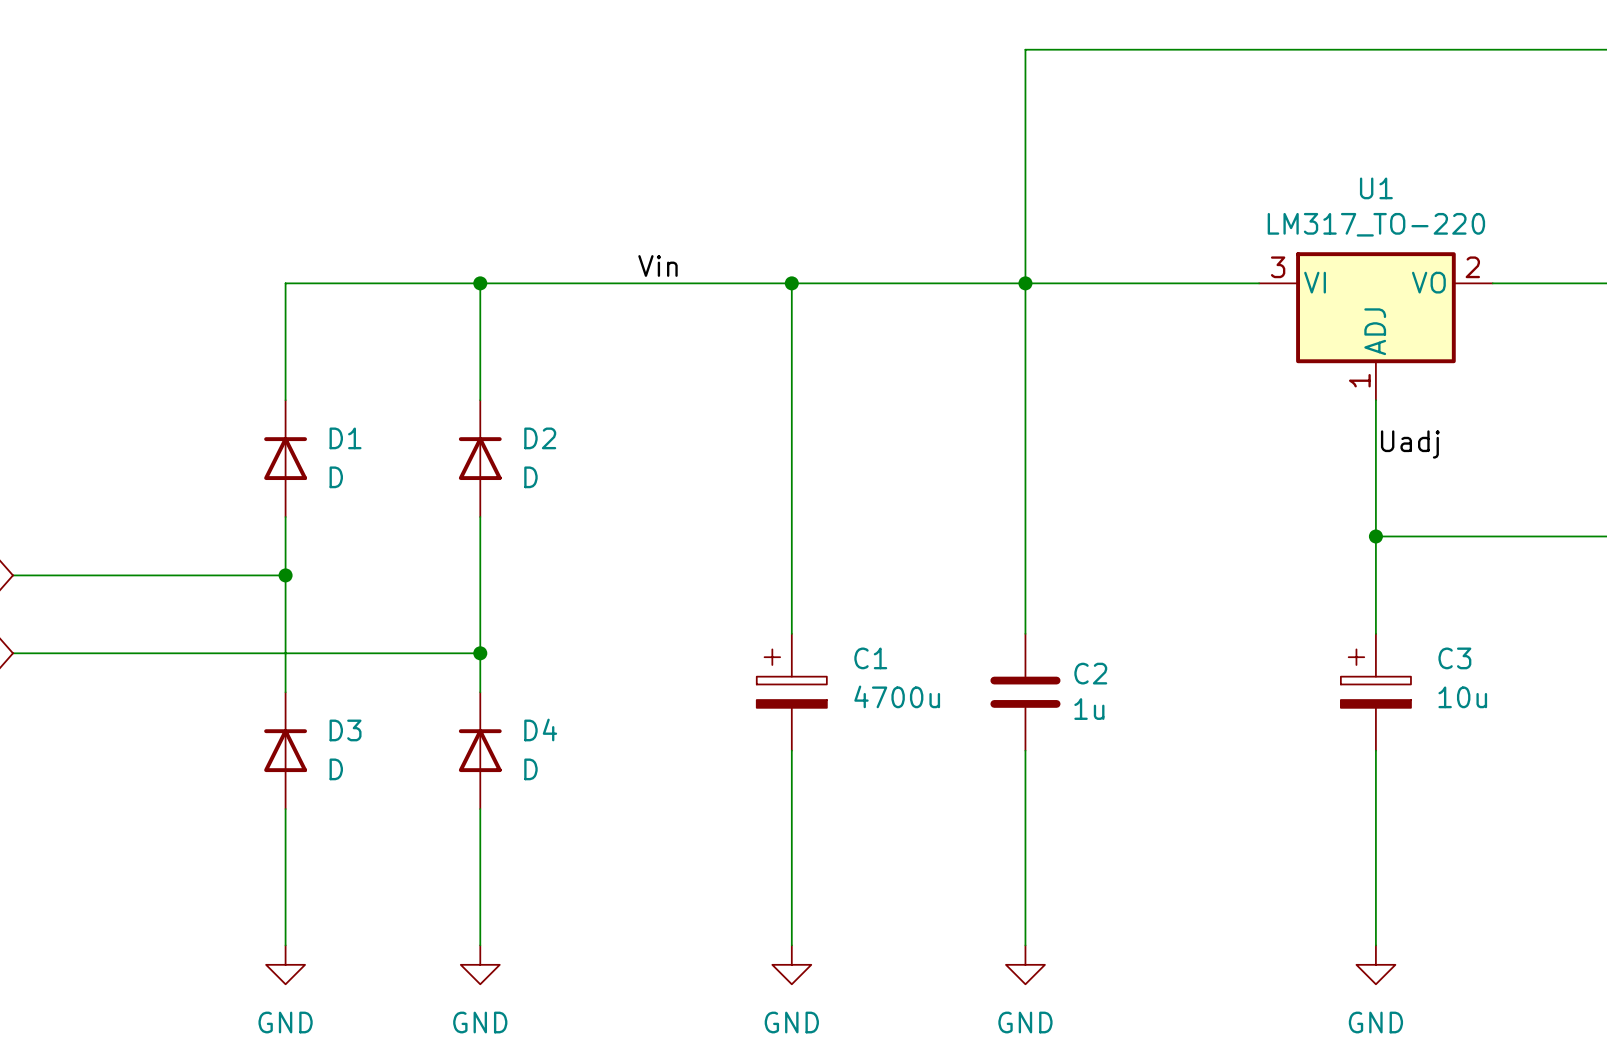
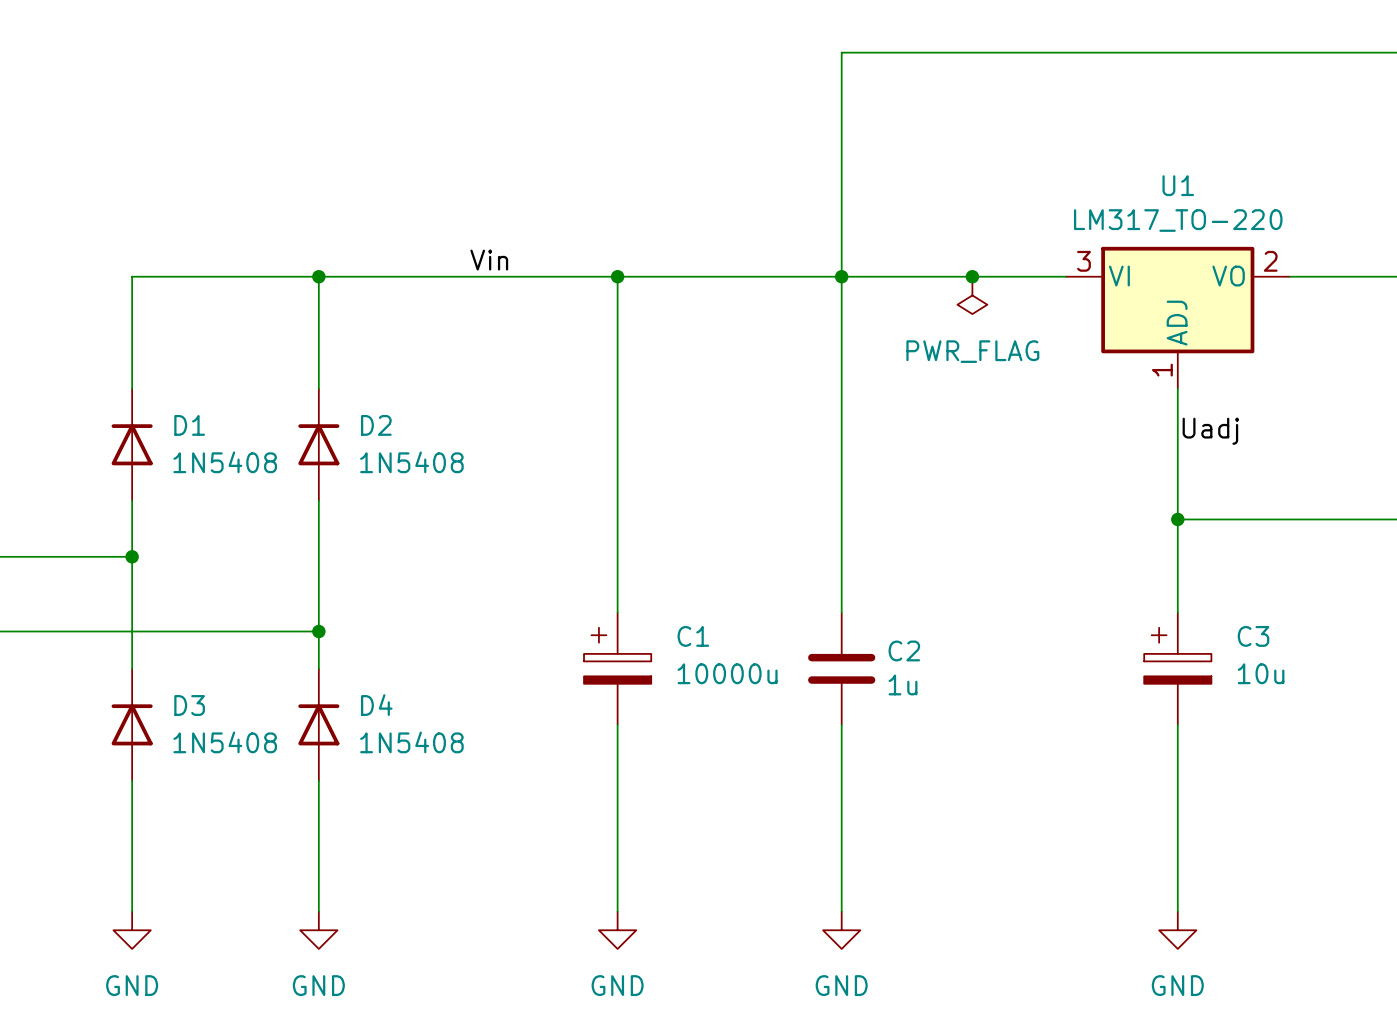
junction: none -> (972, 276)
power symbol: none -> PWR_FLAG (972, 295)
D1 value: D (336, 477) -> 1N5408 (225, 462)
D2 value: D (530, 477) -> 1N5408 (411, 462)
C1 value: 4700u (897, 696) -> 10000u (727, 673)
D3 value: D (336, 769) -> 1N5408 (225, 742)
D4 value: D (530, 769) -> 1N5408 (411, 742)

